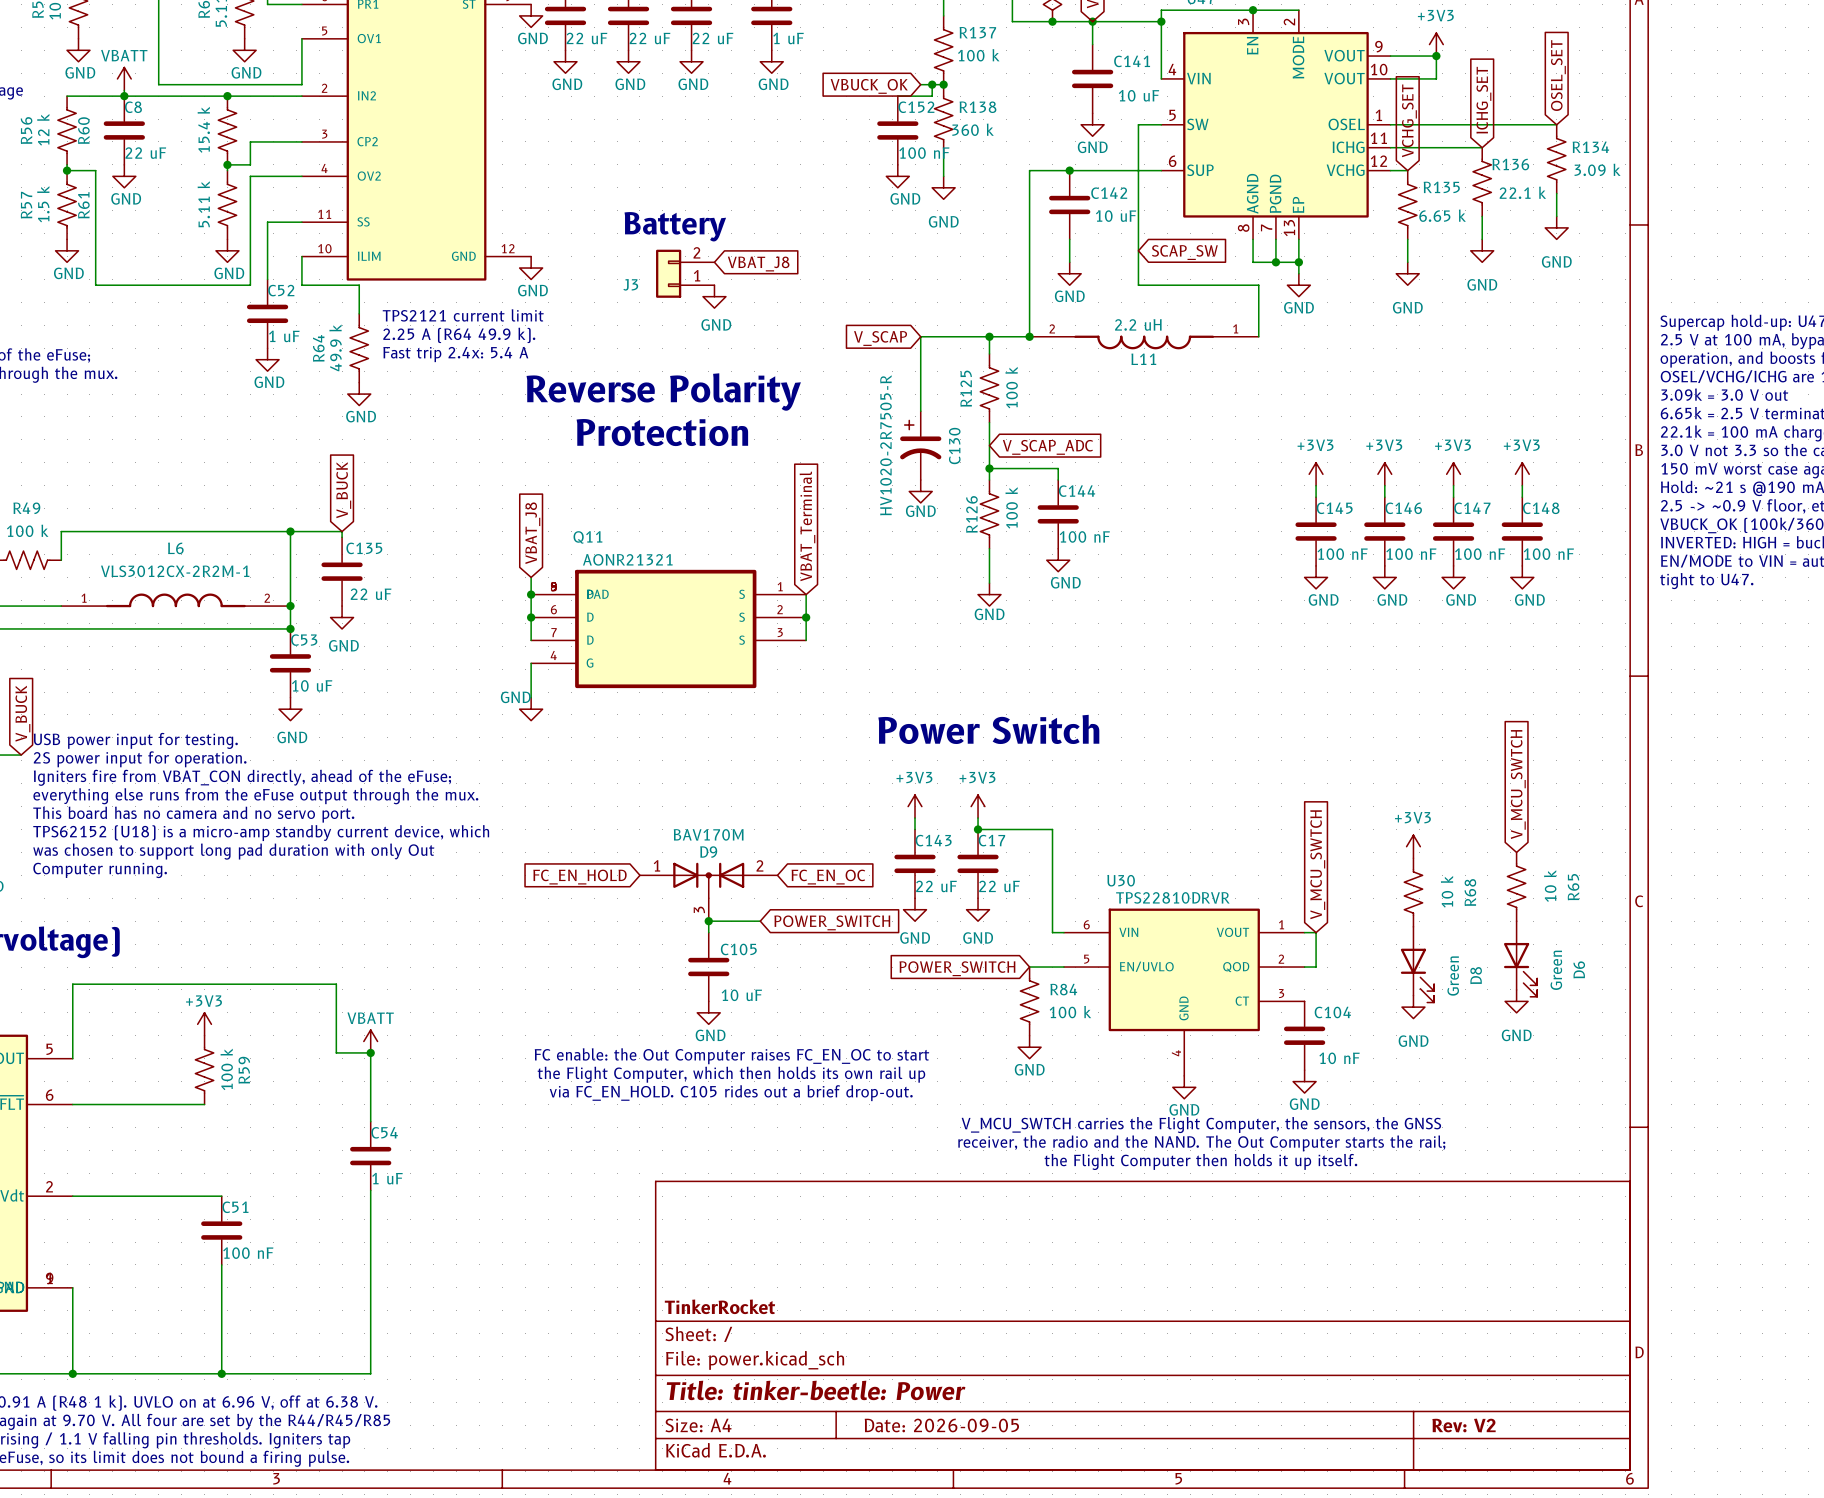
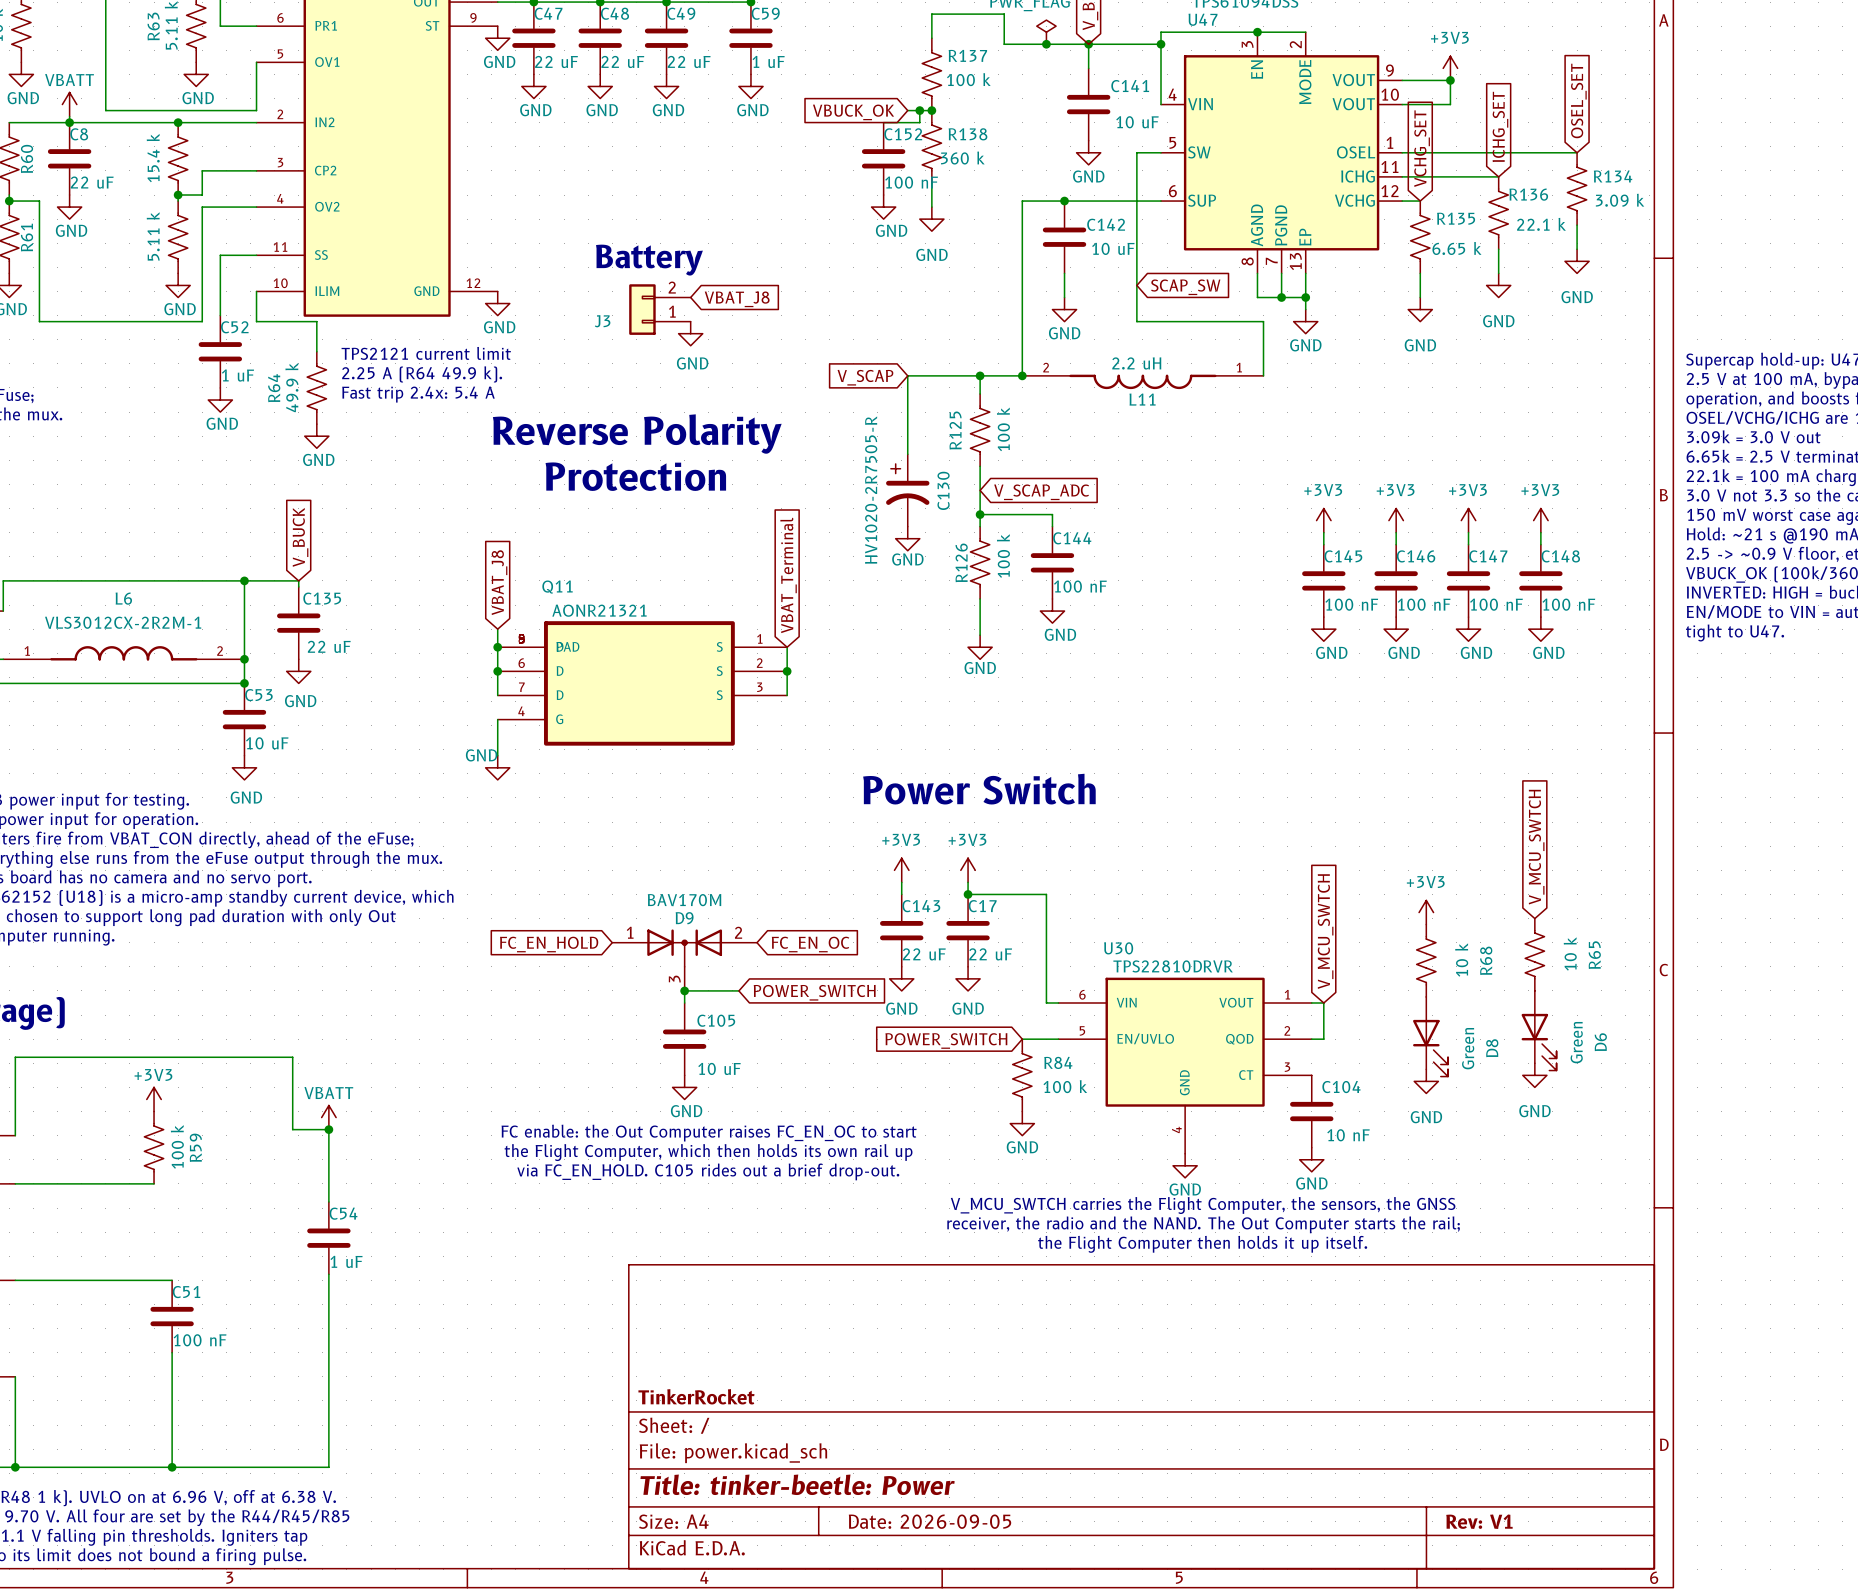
title block: Rev: V2 (1464, 1425) -> Rev: V1 (1479, 1521)

